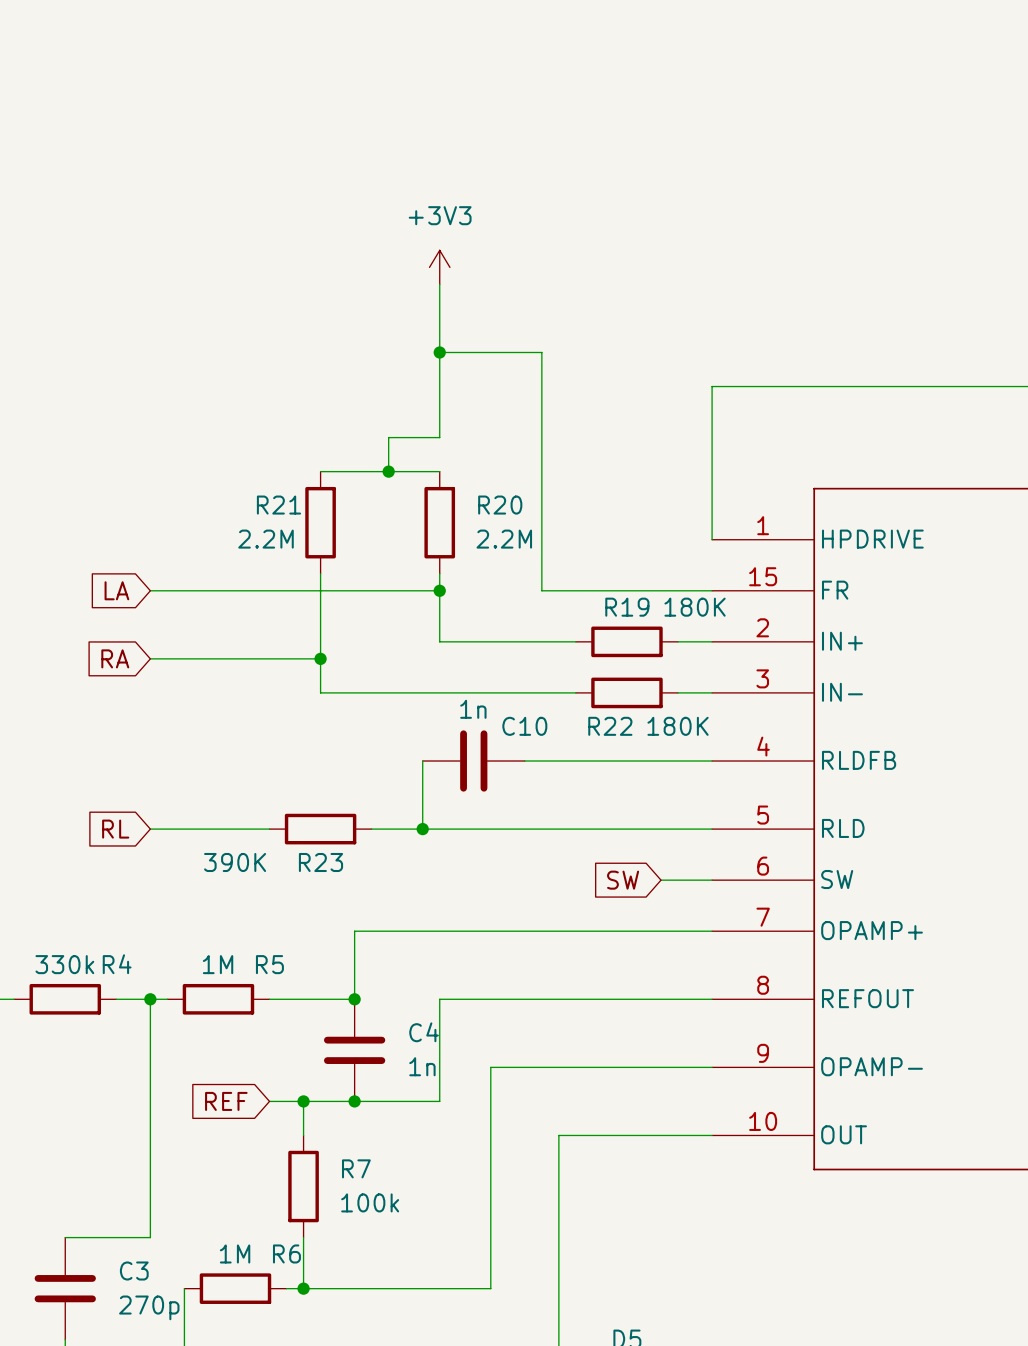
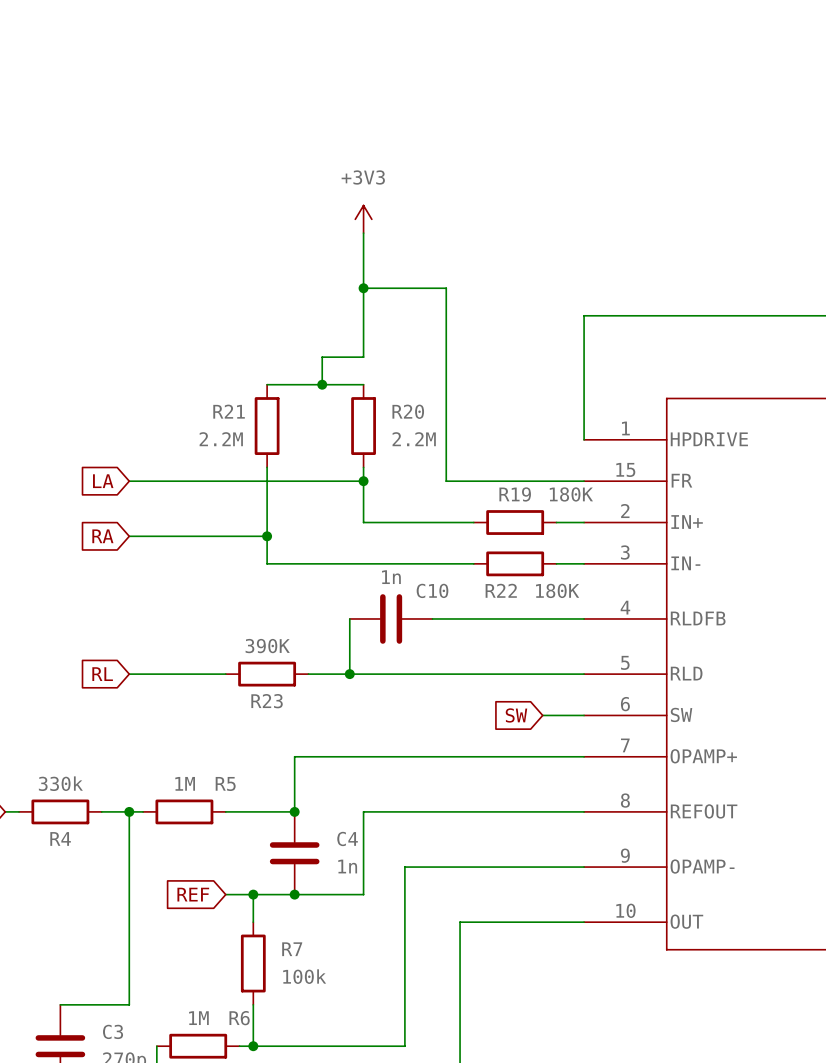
R23 value position: 390K (235, 862) -> 390K (267, 646)
R4 name position: R4 (117, 964) -> R4 (60, 838)

